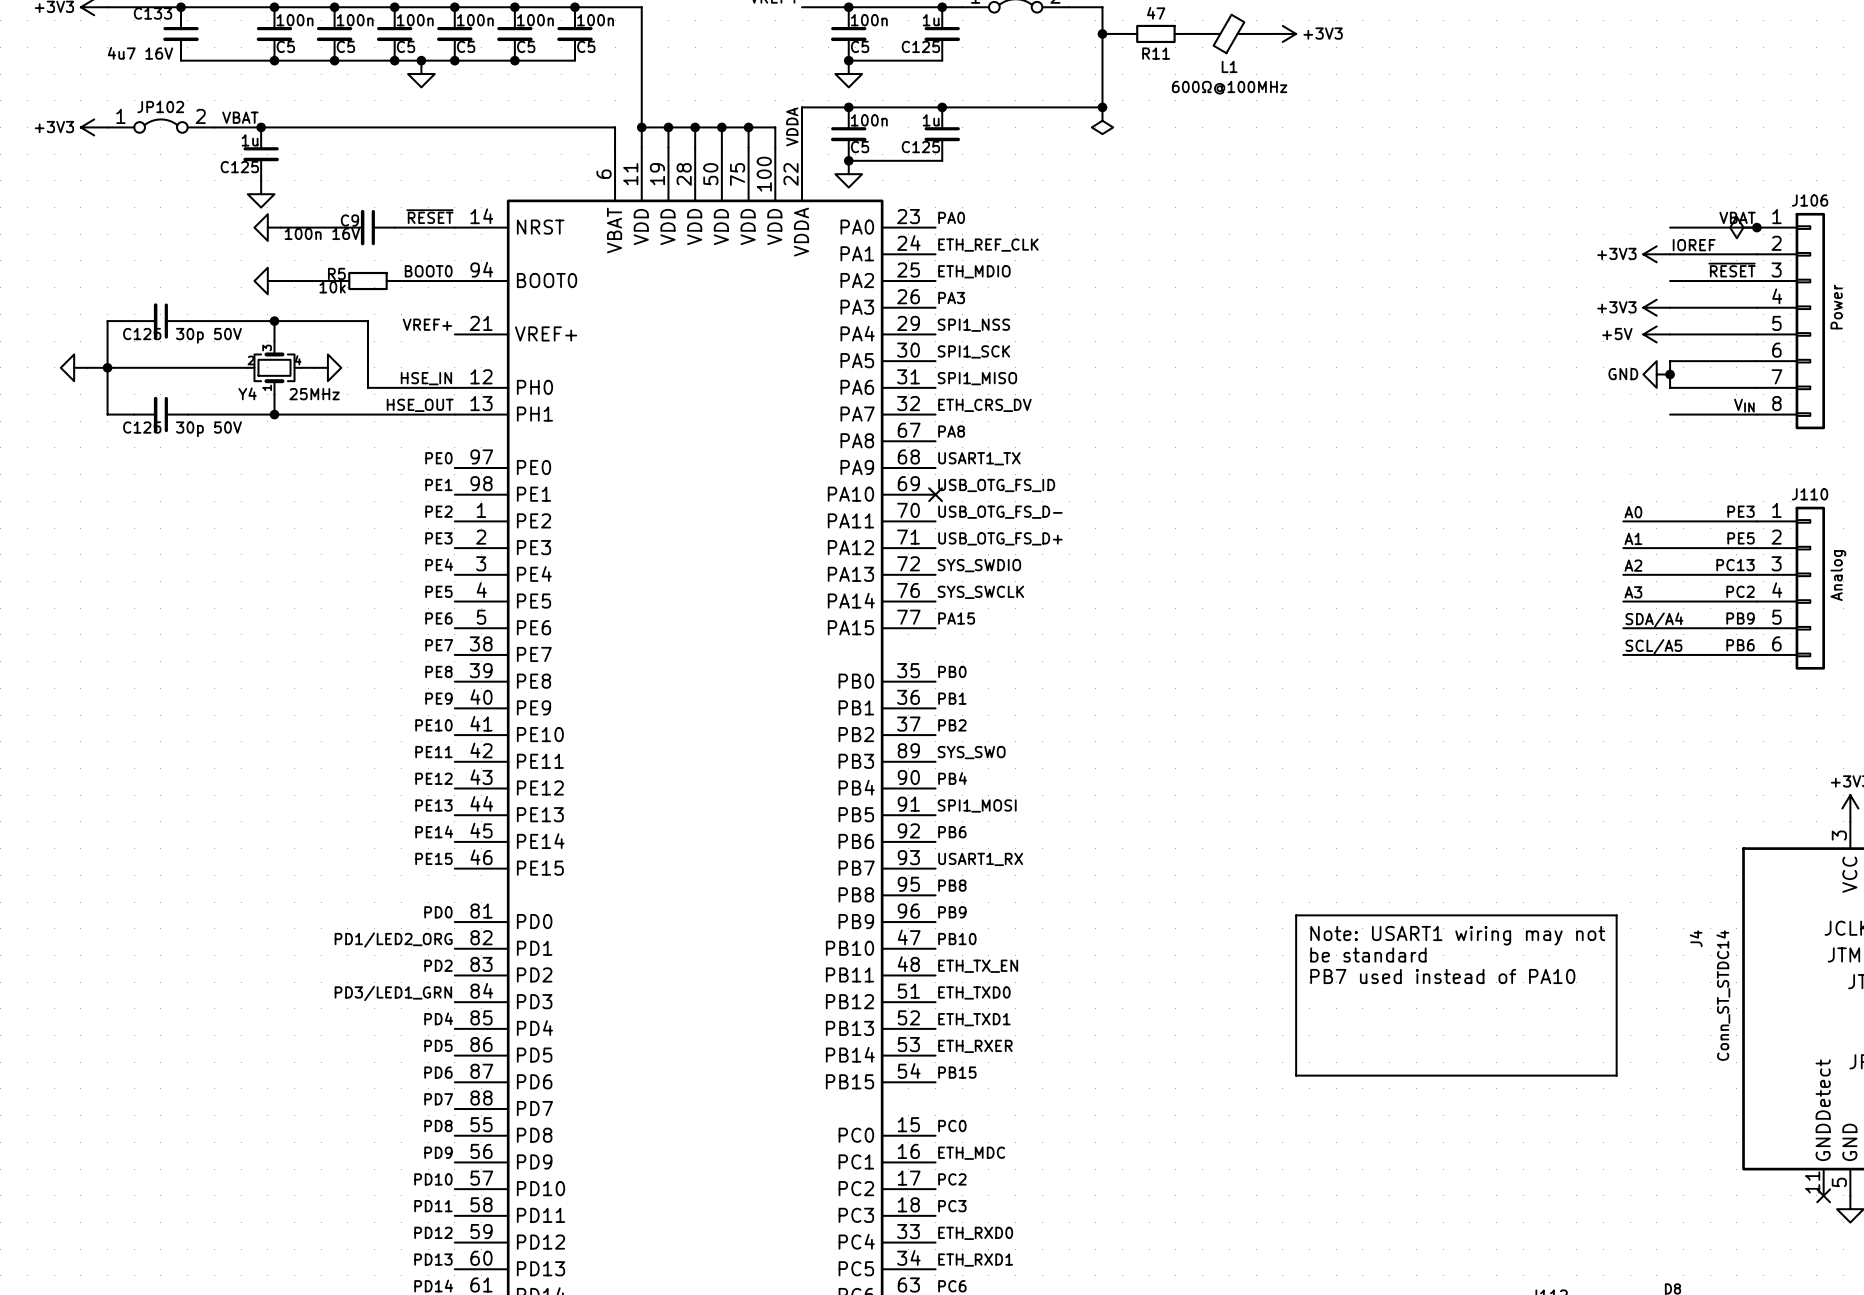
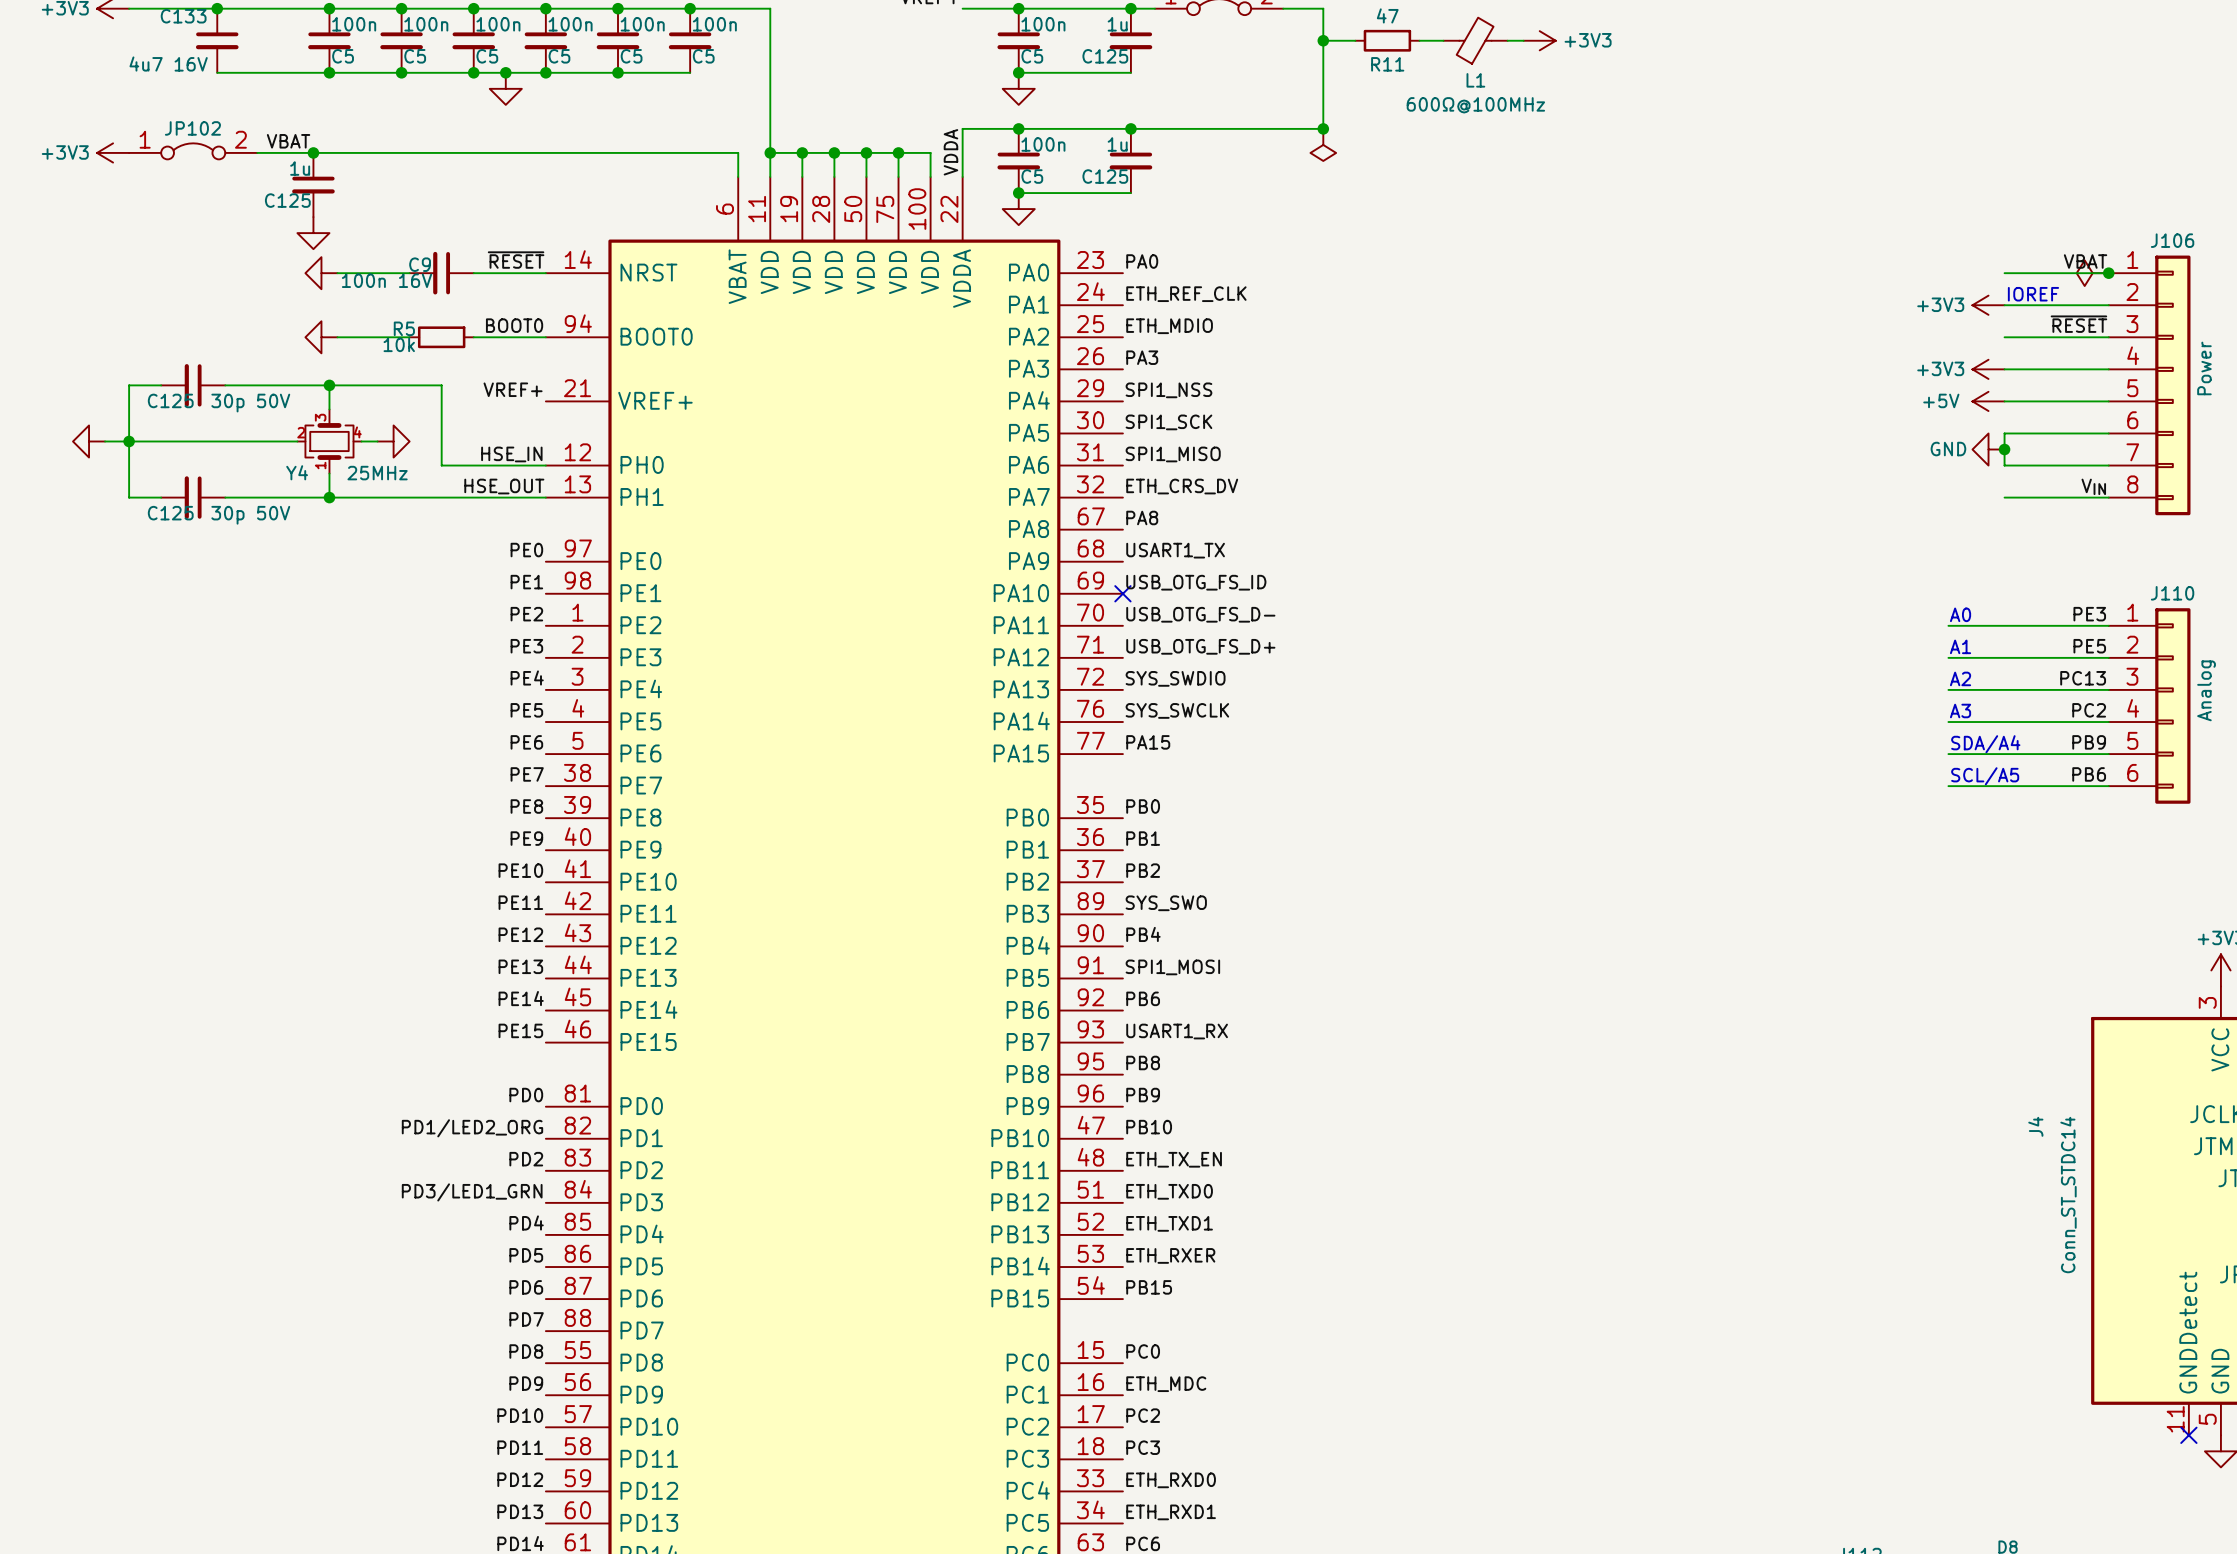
line: (1296, 915) (1616, 915) (1616, 1075) (1296, 1075) (1296, 915) -> none
text: Note: USART1 wiring may not (1457, 935) -> none
text: be standard (1368, 955) -> none
text: PB7 used instead of PA10 (1442, 976) -> none

